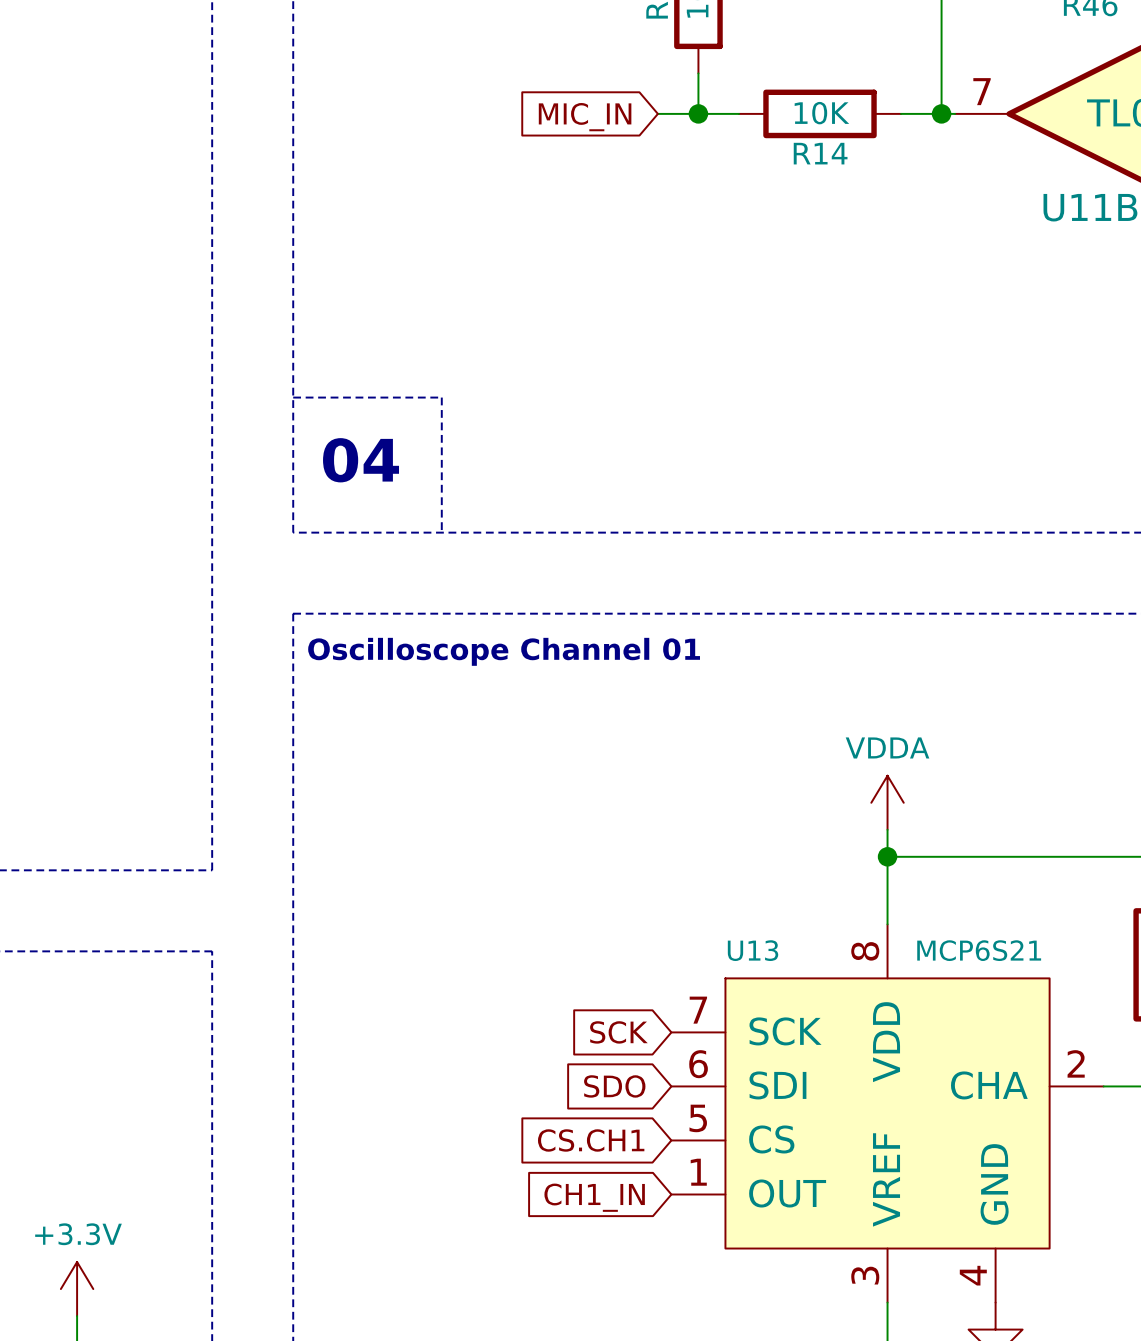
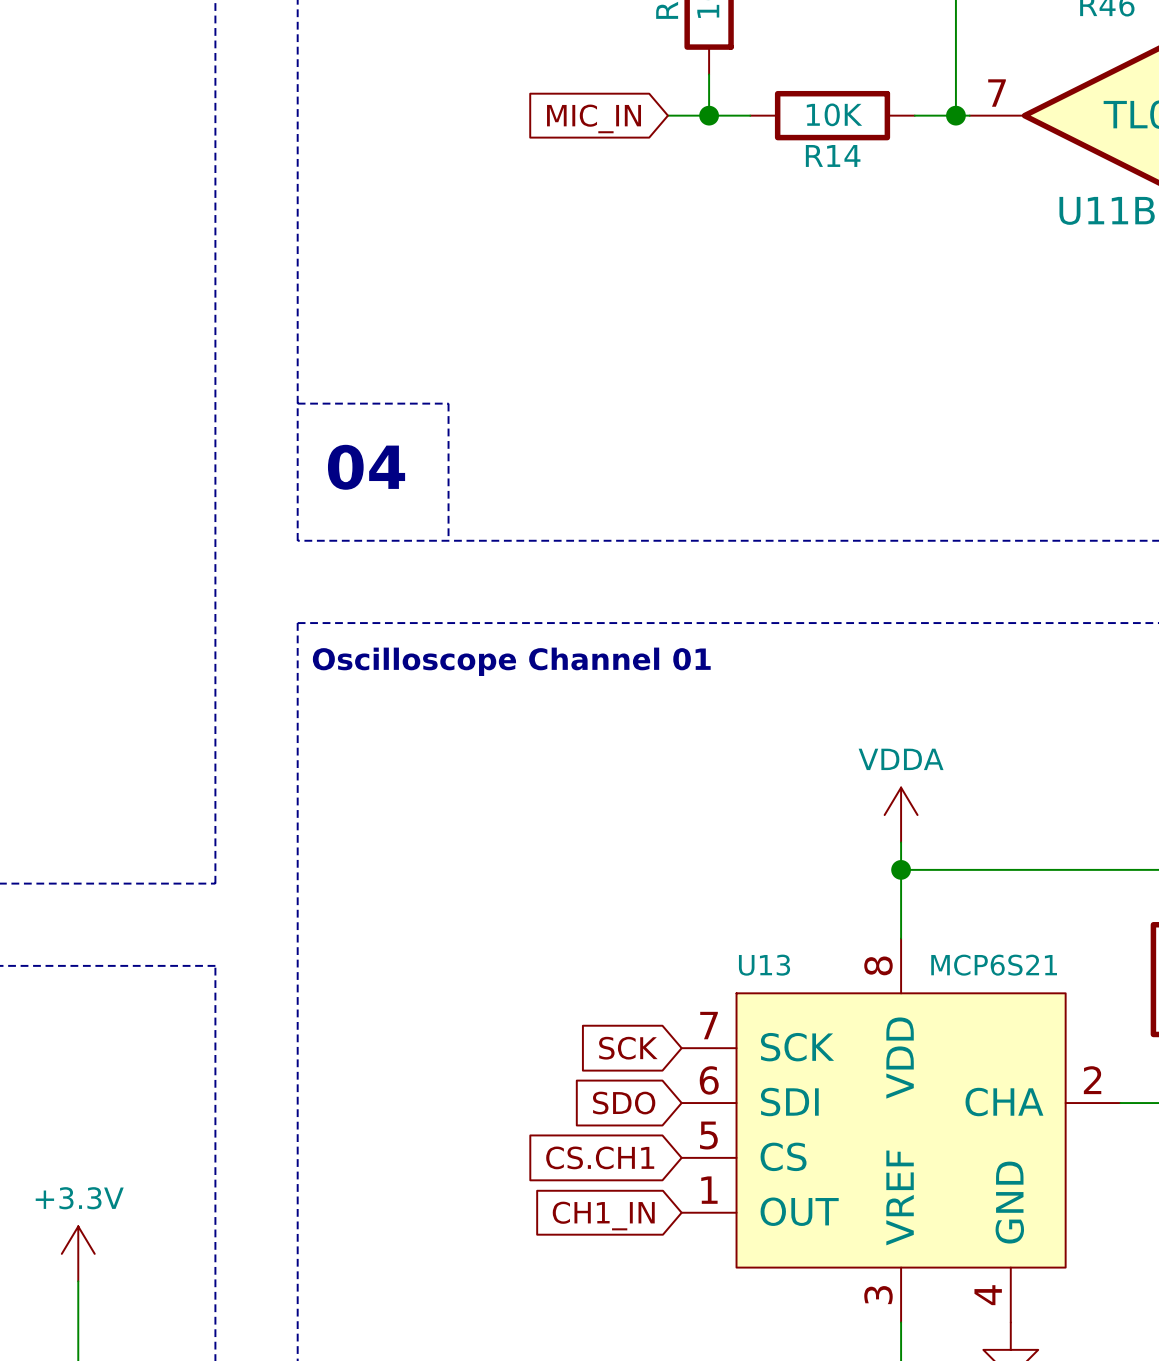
power symbol position: +3.3V (77, 1289) -> +3.3V (78, 1253)

